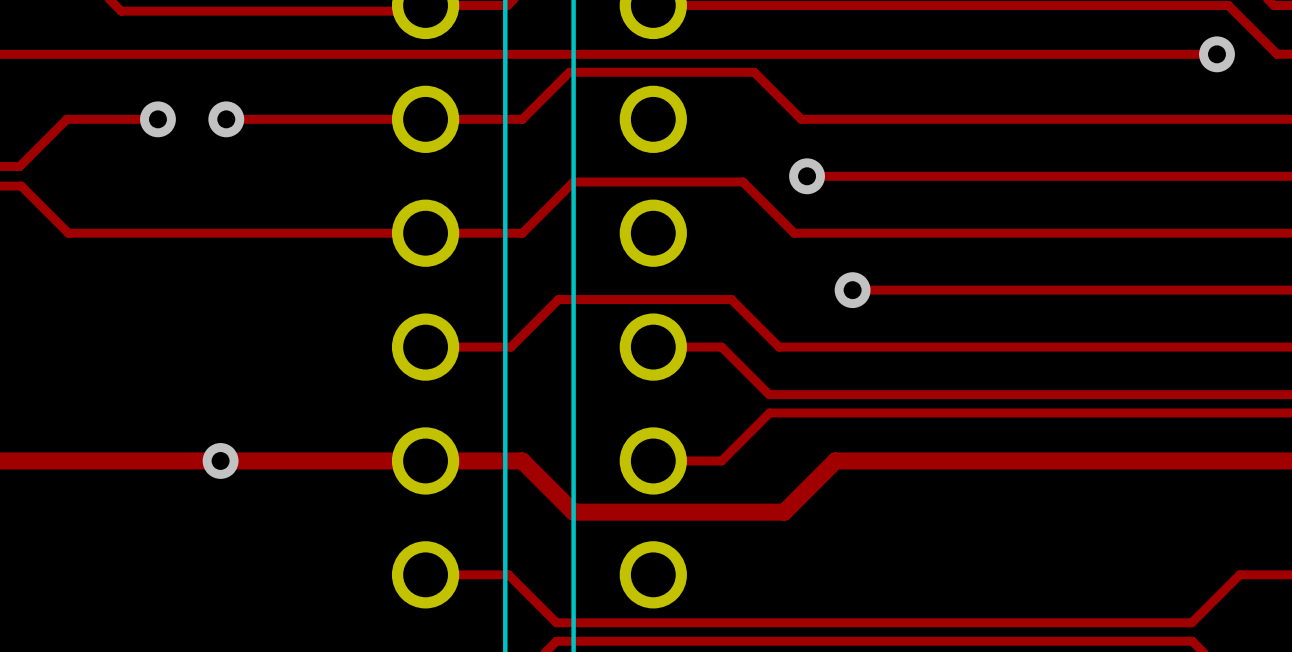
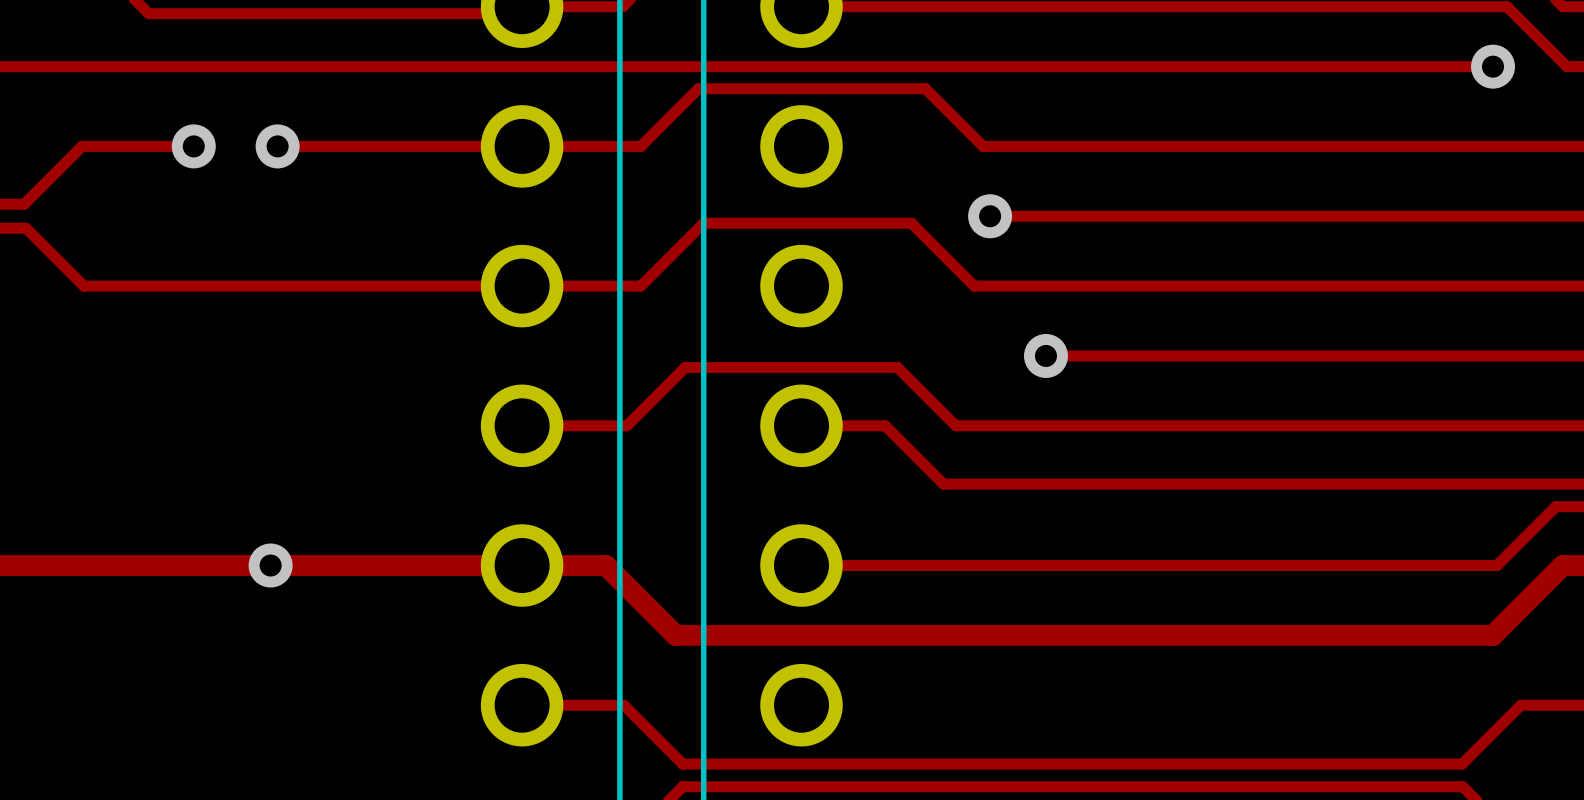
track: (1268, 413) (769, 413) (721, 460) -> none
track: (493, 460) (522, 460) (573, 512) (784, 512) (835, 460) -> (885, 565) (1024, 565)
track: none -> (605, 565) (675, 635) (1493, 635) (1562, 565)
track width: thick (835, 460) (1220, 460) -> thin (1024, 565) (1497, 565)
track: (1220, 460) (1273, 460) -> (1497, 565) (1555, 506)

